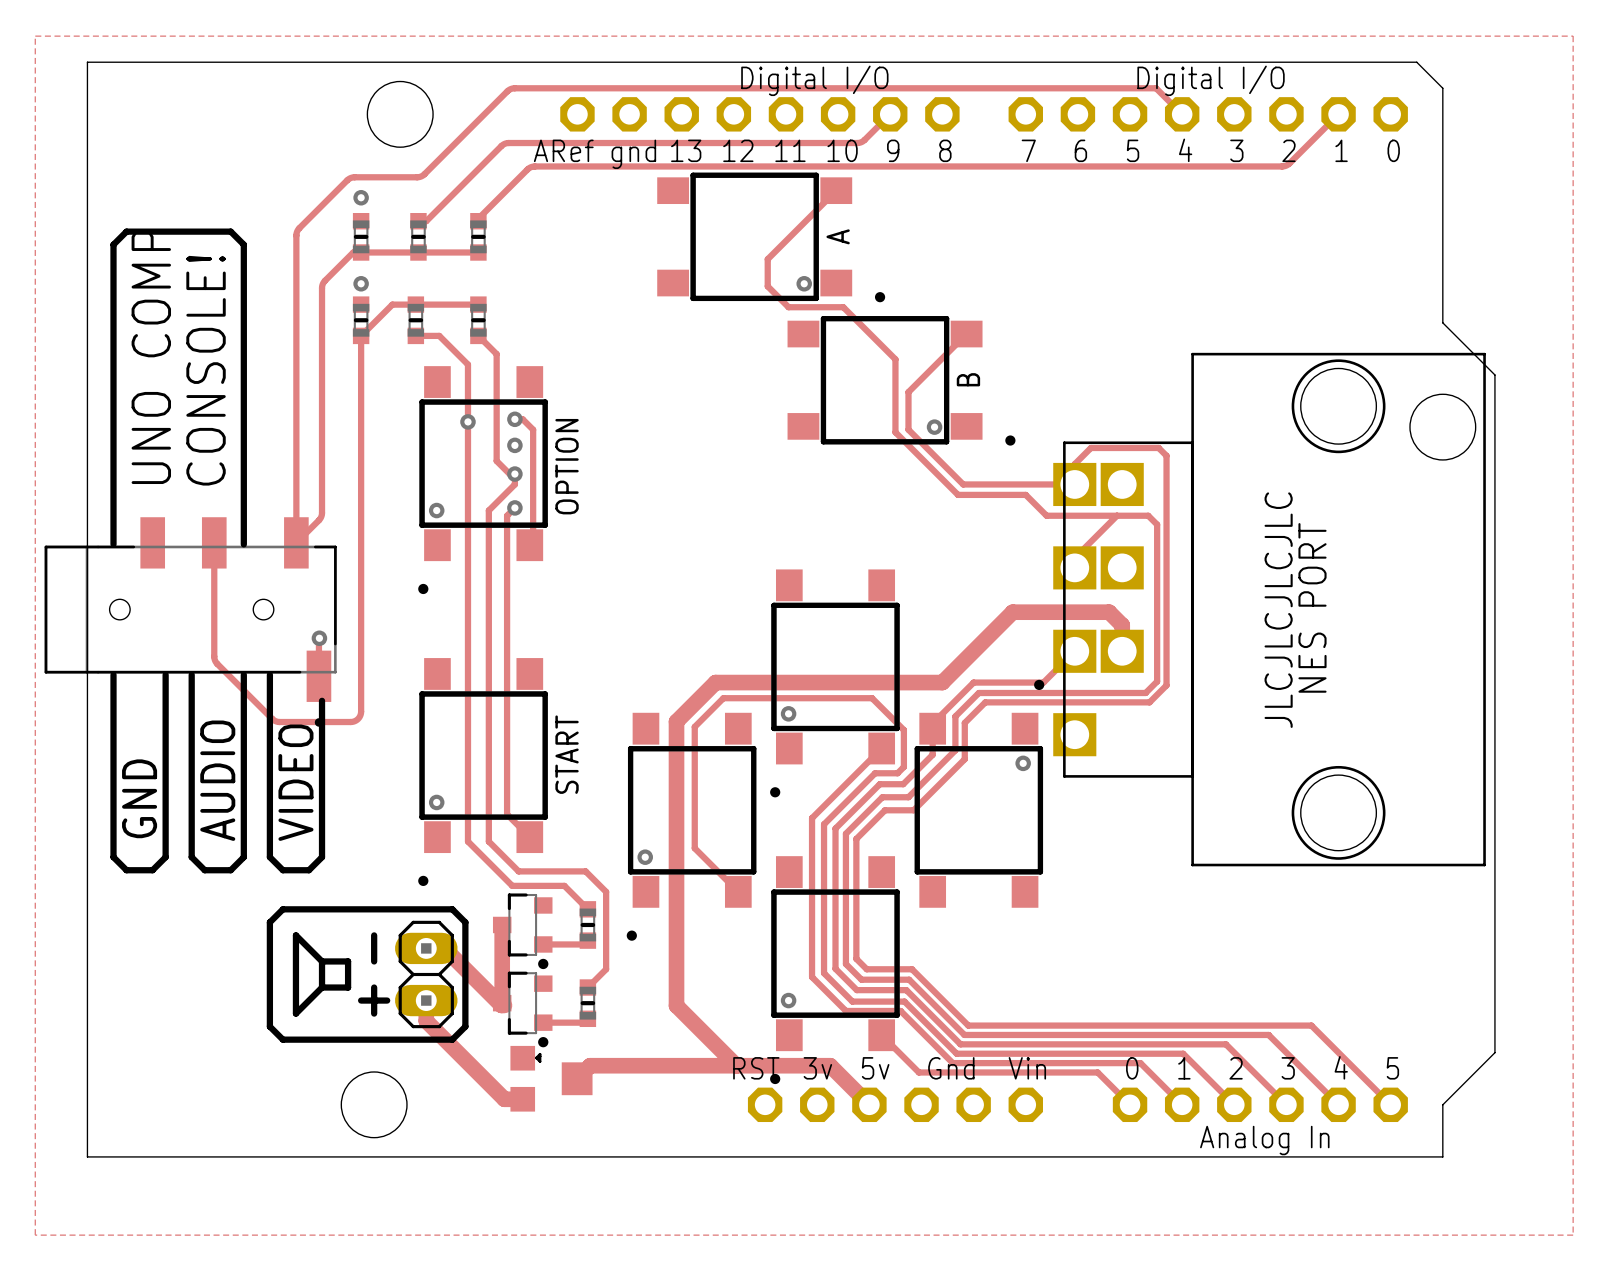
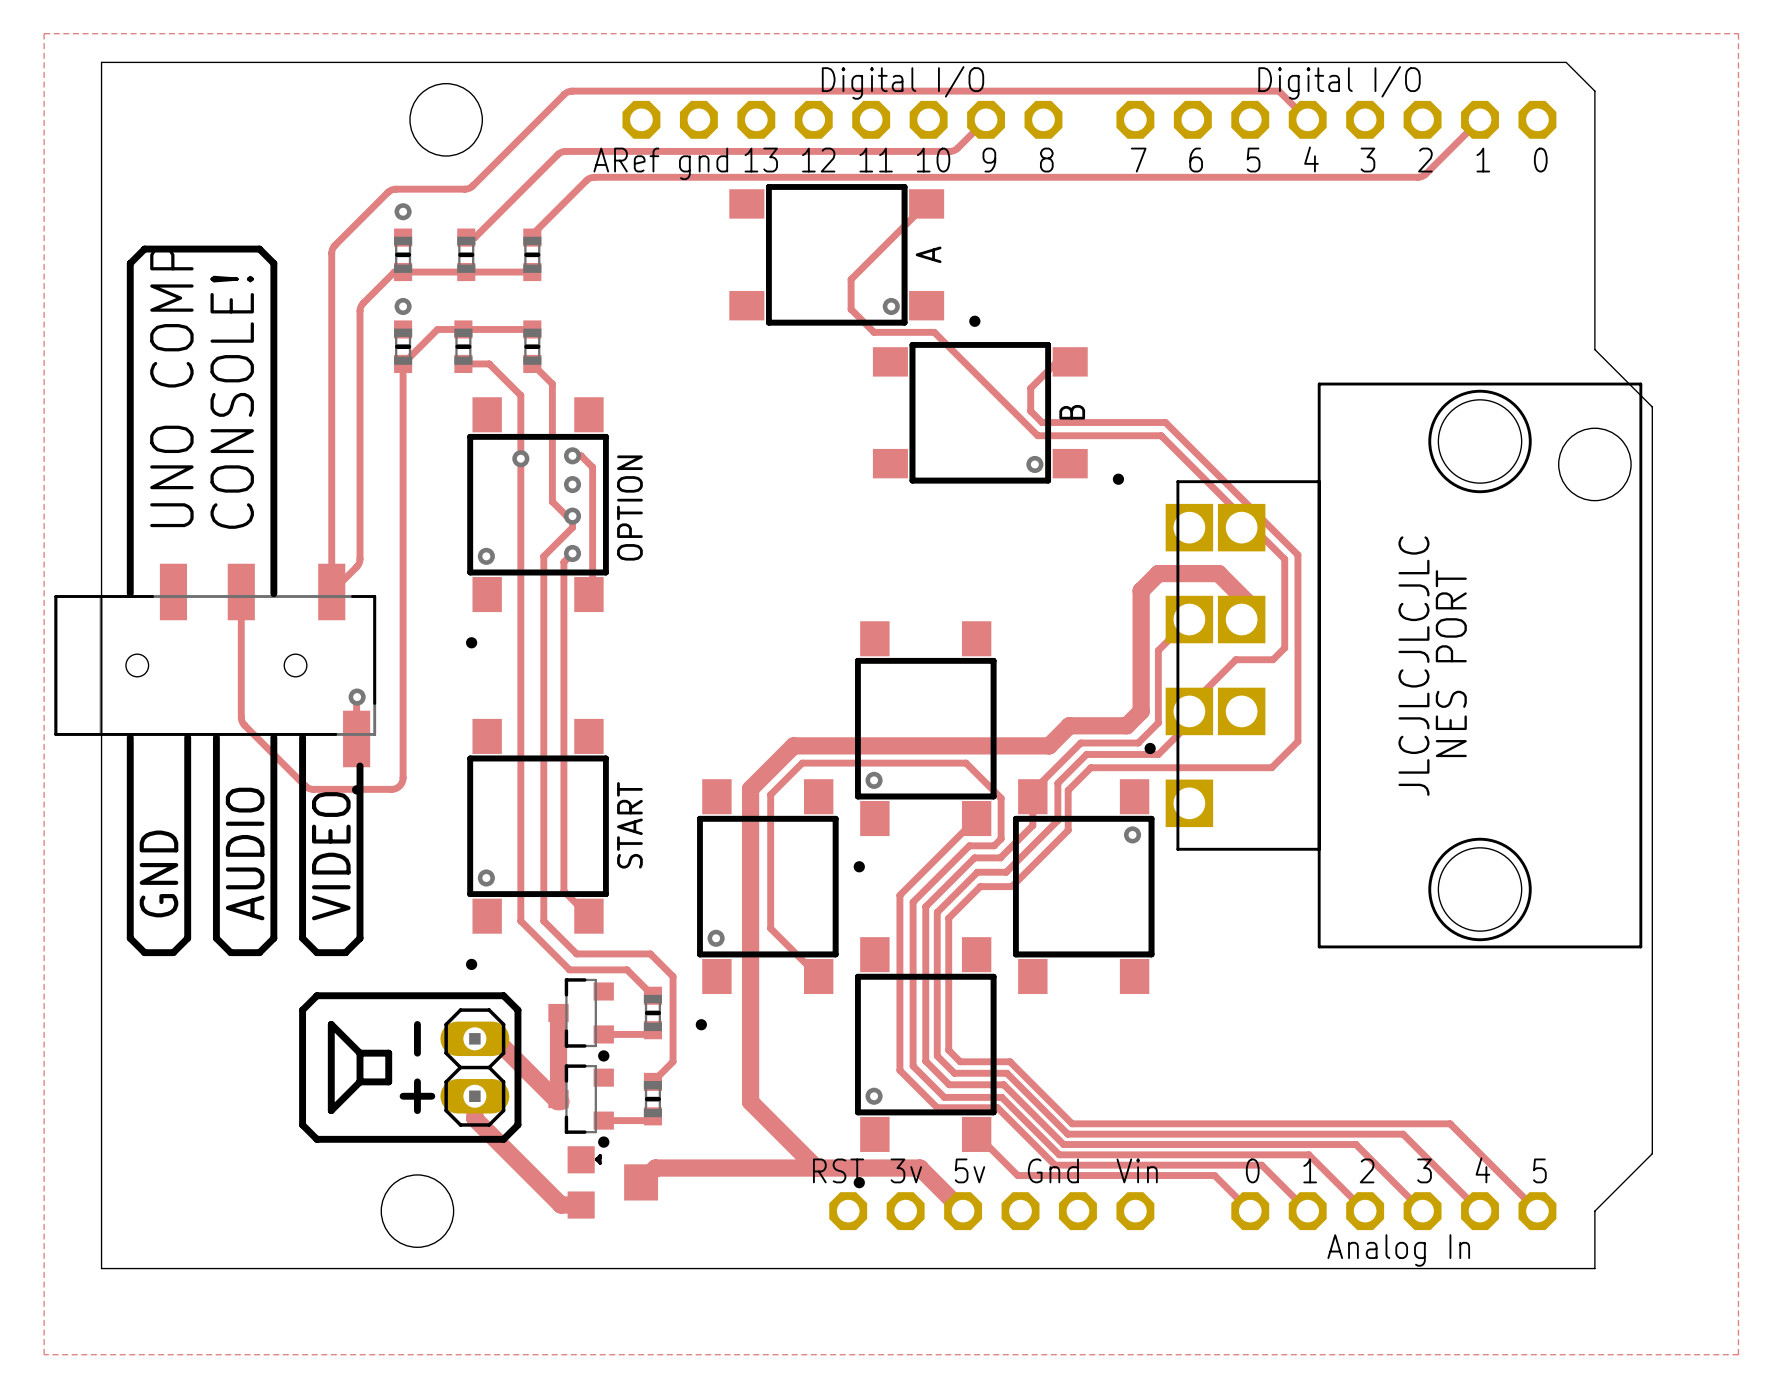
track: (966, 334) (908, 392) (908, 429) (963, 484) (1074, 484) (1074, 464) (1090, 447) (1158, 447) (1166, 455) (1166, 685) -> (1070, 361) (1057, 361) (1030, 388) (1030, 411) (1042, 422) (1165, 422) (1297, 554) (1297, 741) (1290, 749)
track: (895, 359) (895, 432) (958, 494) (1025, 494) (1046, 515) (1148, 515) (1157, 524) (1157, 681) (1145, 692) (978, 692) -> (991, 389) (1037, 435) (1161, 435) (1284, 559) (1284, 648) (1273, 659) (1235, 659) (1189, 706) (1189, 723) (1158, 754) (1086, 754) (1083, 757)
track: (1117, 515) (1074, 557) (1074, 567) -> none
track: (1074, 651) (1043, 682) (973, 682) -> (1189, 619) (1158, 650) (1158, 722) (1138, 743) (1080, 743) (1077, 745)
track: (1122, 651) (1122, 625) (1109, 612) (1012, 612) (942, 682) -> (1250, 619) (1250, 605) (1218, 573) (1158, 573) (1141, 590) (1141, 711) (1126, 725) (1069, 725) (1049, 745) (1043, 745)

